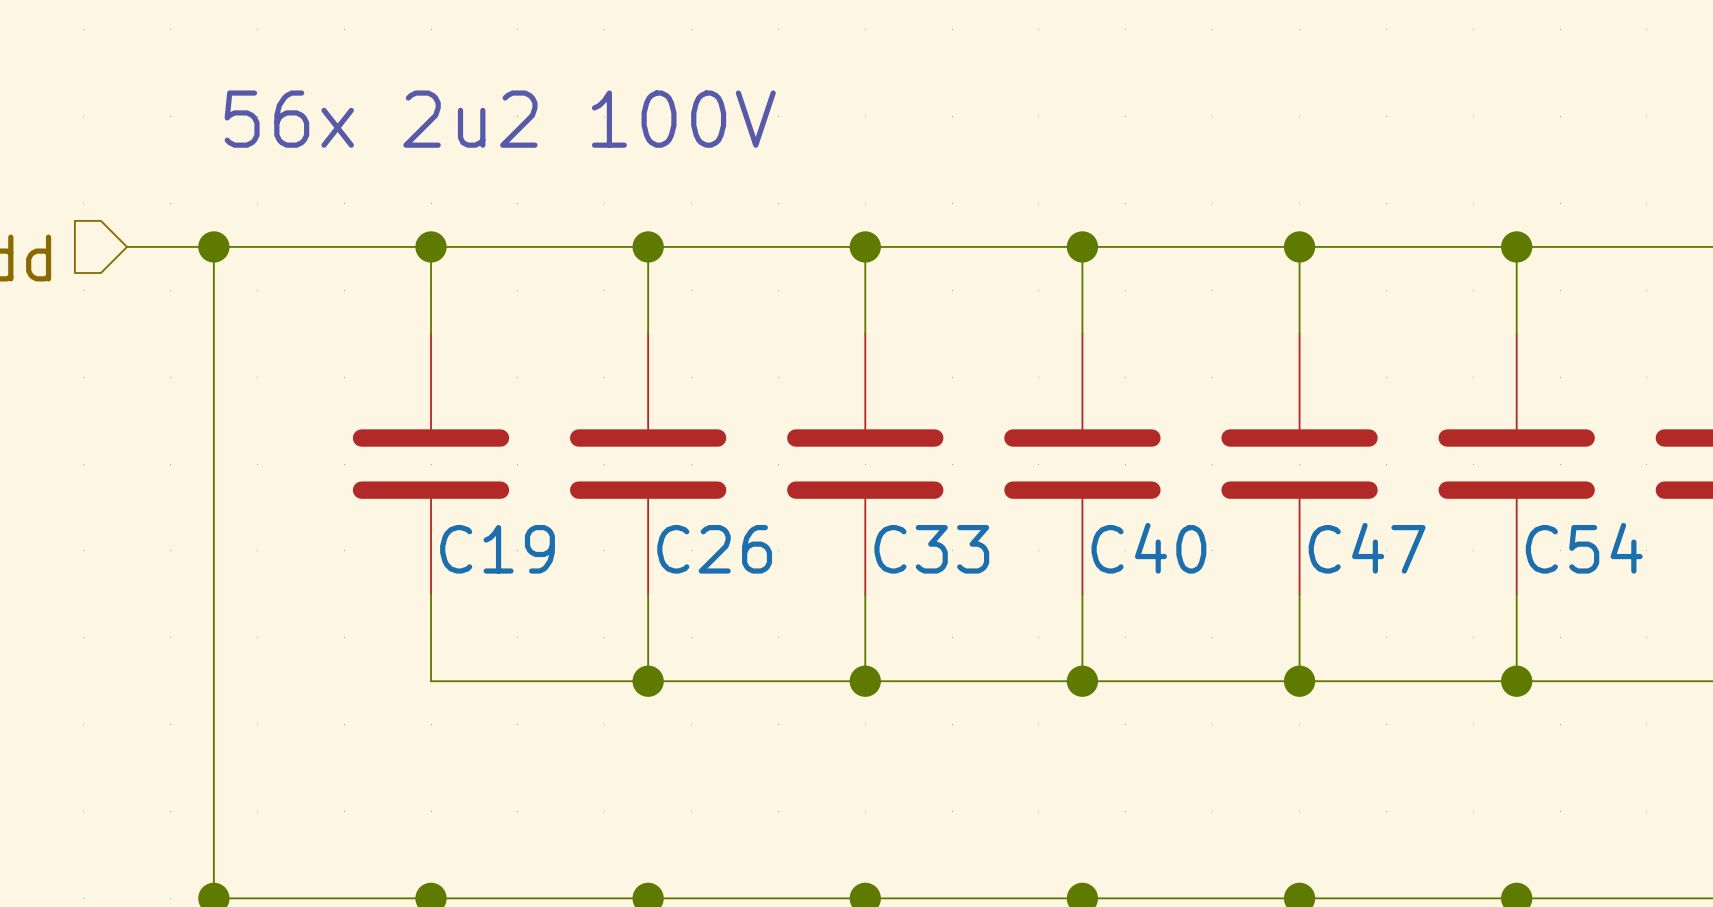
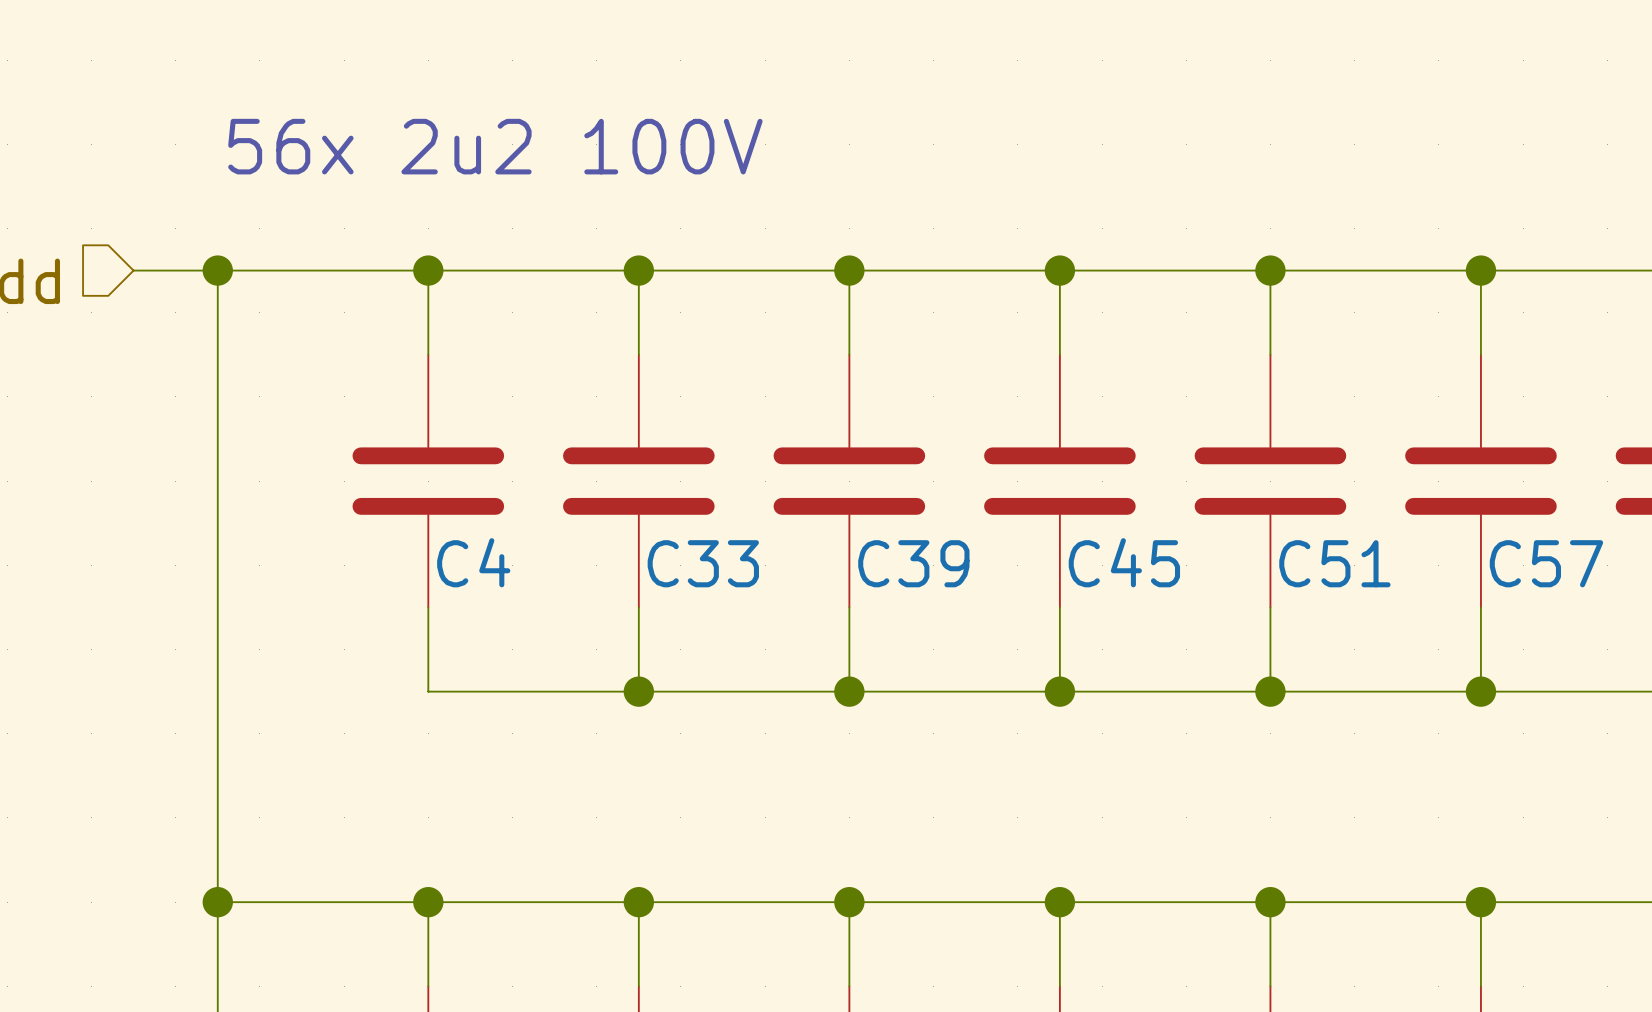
C40 name: C40 (1148, 548) -> C45 (1124, 562)
C47 name: C47 (1367, 548) -> C51 (1334, 563)
C54 name: C54 (1584, 548) -> C57 (1546, 563)
C19 name: C19 (497, 549) -> C4 (473, 562)
C26 name: C26 (714, 549) -> C33 (703, 563)
C33 name: C33 (931, 549) -> C39 (913, 563)

